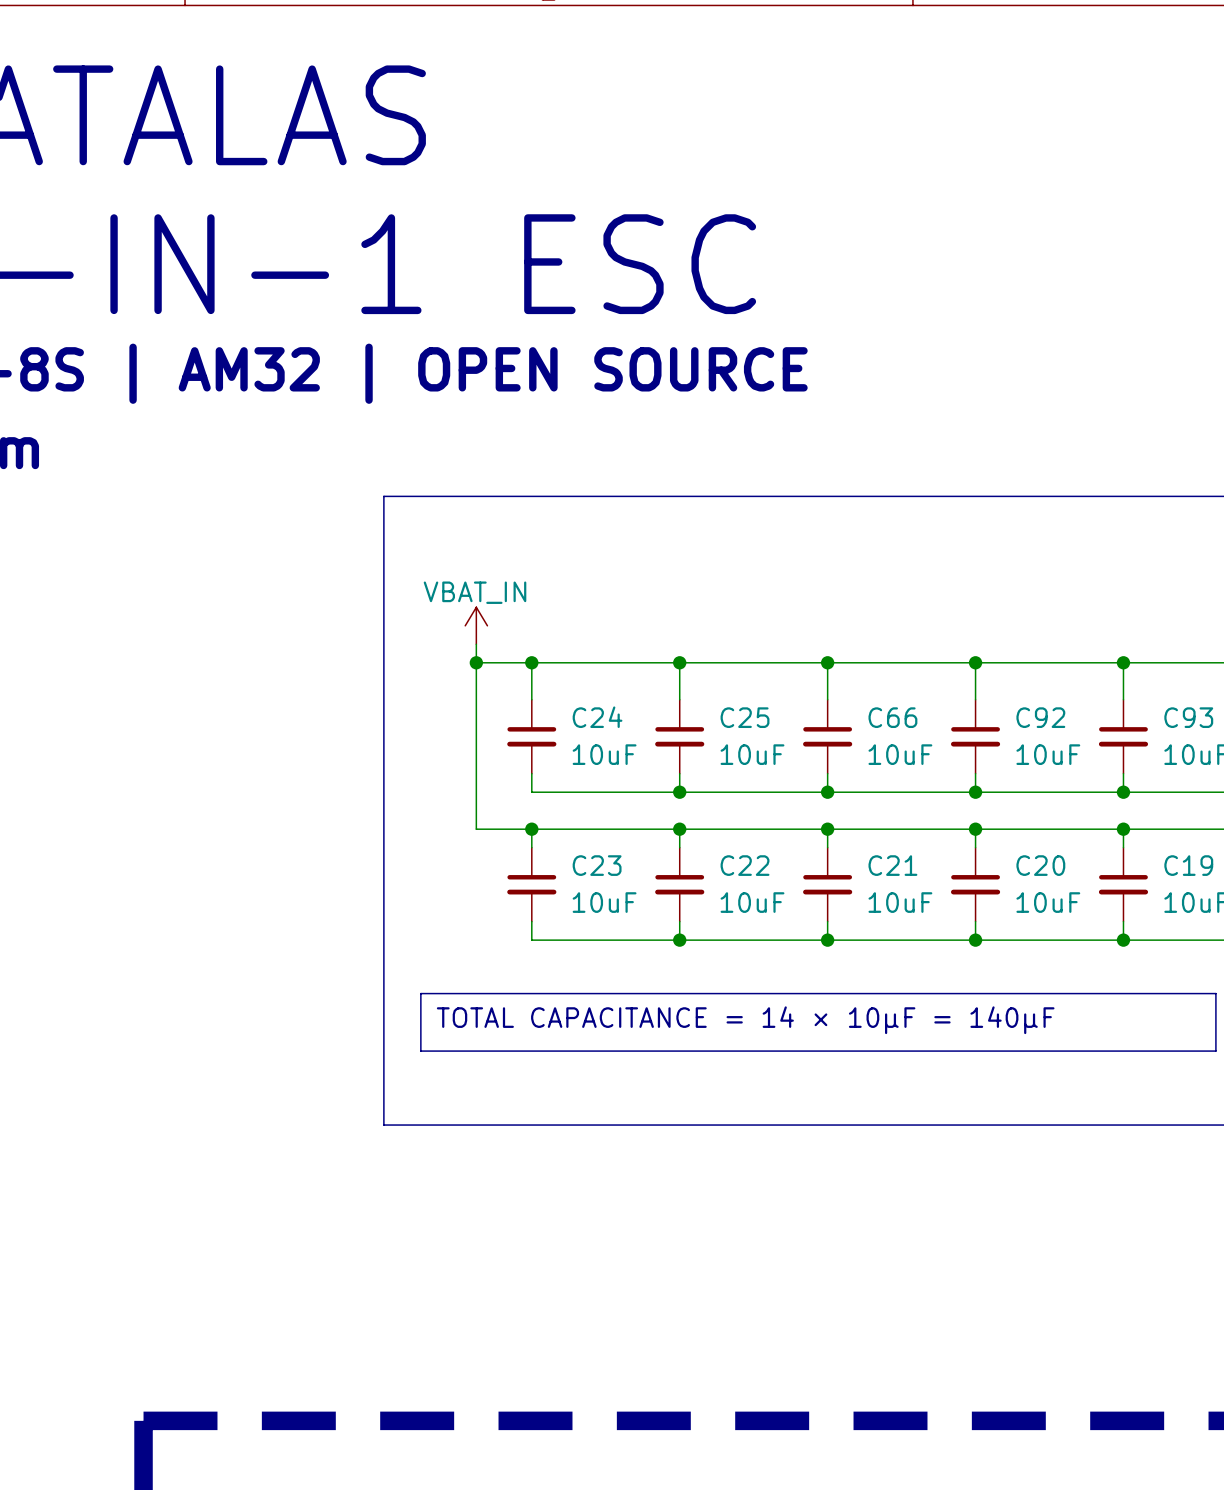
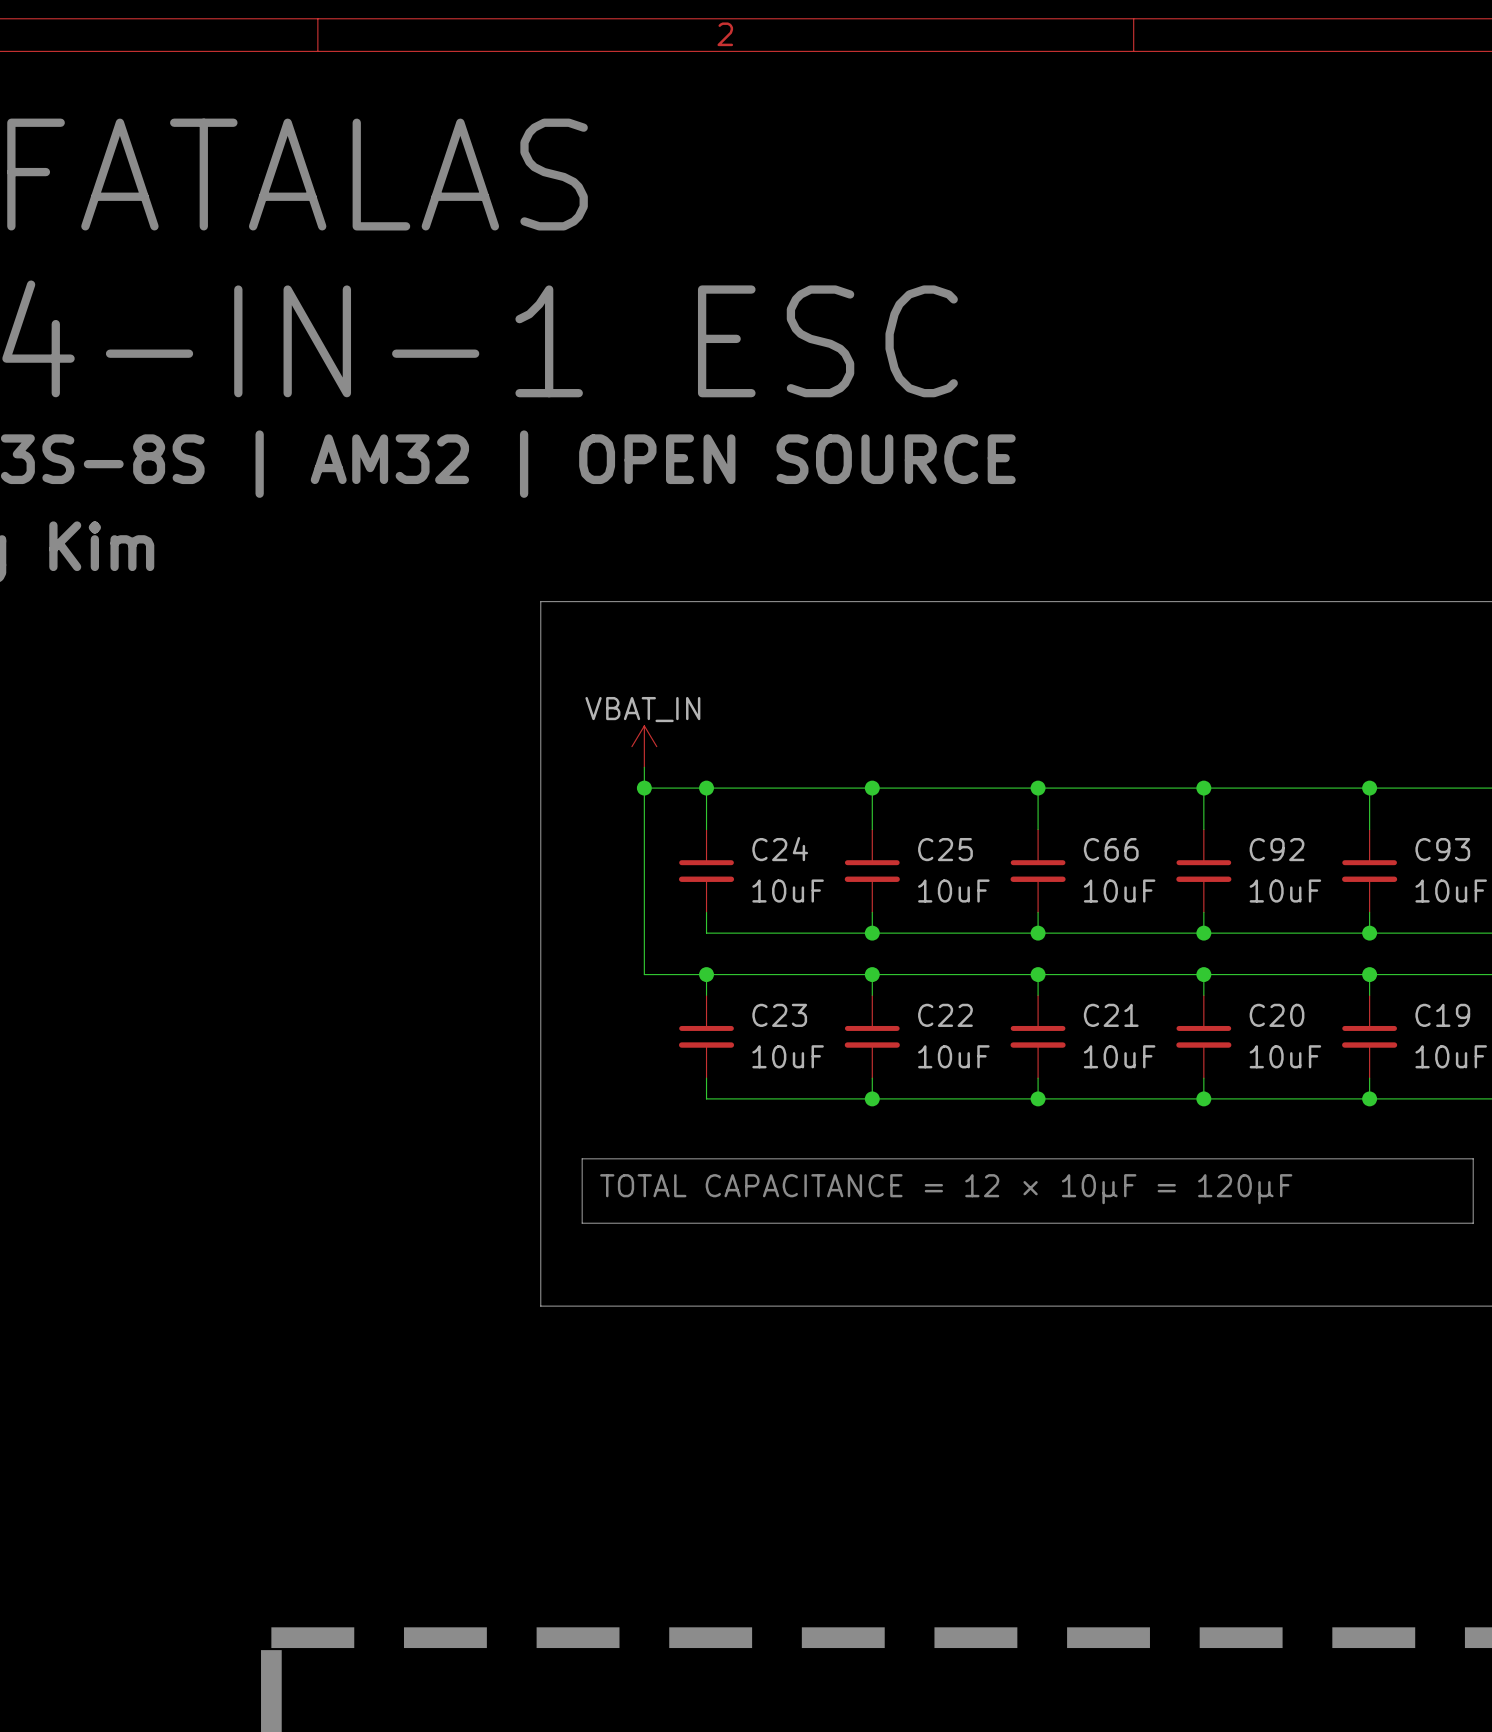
text: TOTAL CAPACITANCE = 14 × 10µF = 140µF (745, 1020) -> TOTAL CAPACITANCE = 12 × 10µF = 120µF (946, 1189)

